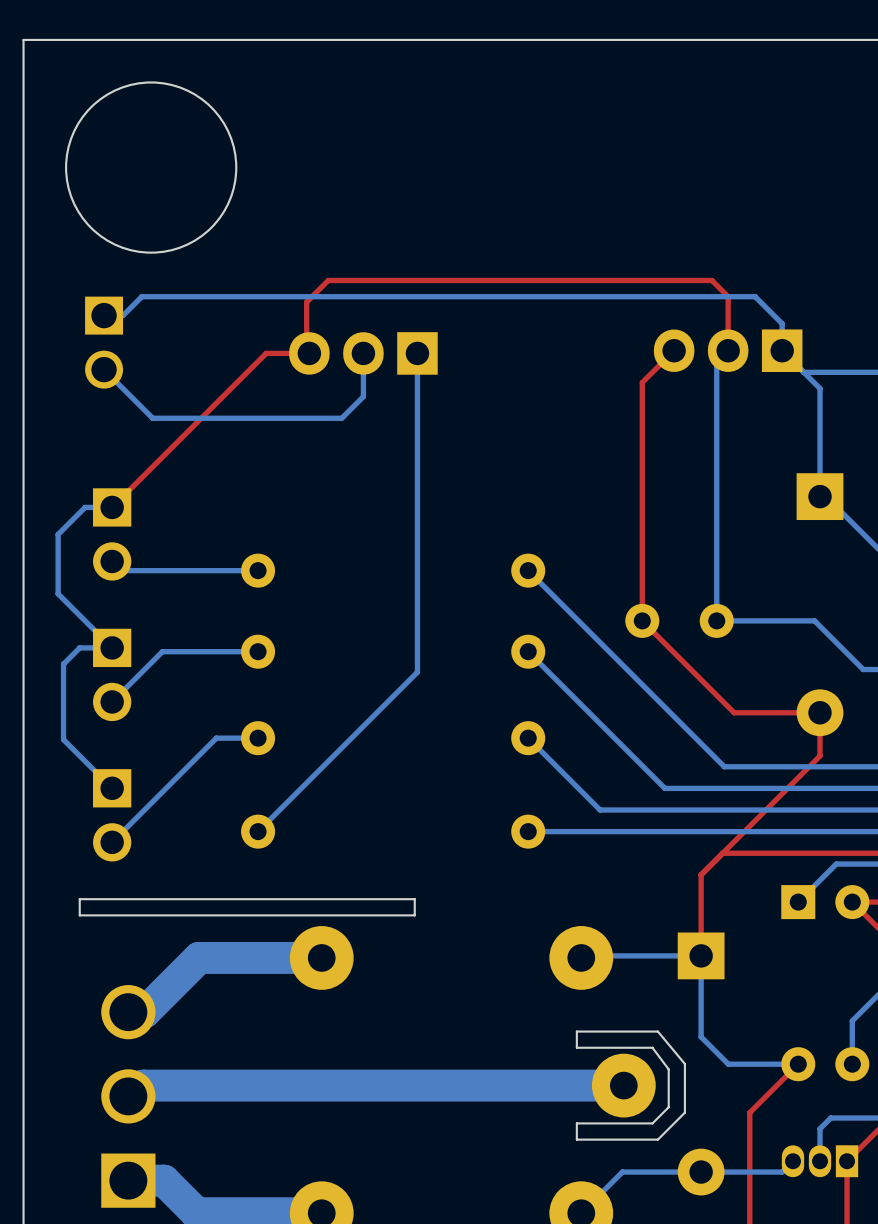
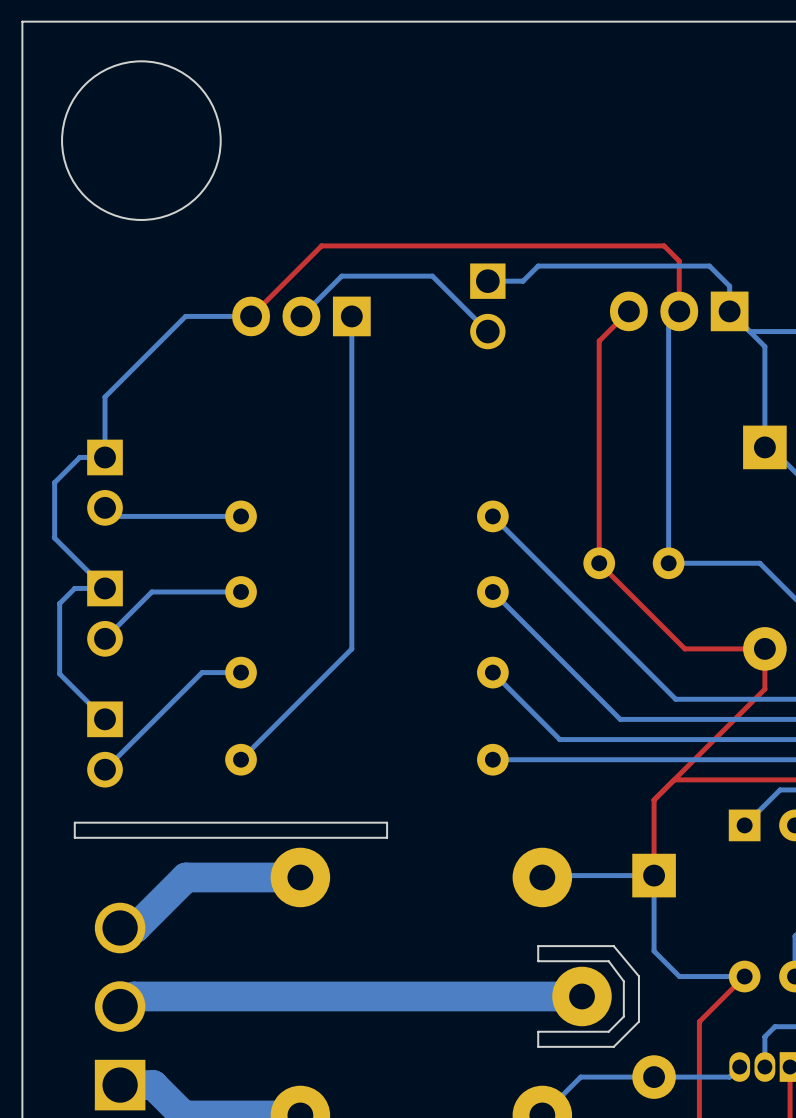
top track: (344, 280) (328, 280) (306, 302) (306, 356) -> (321, 245) (251, 316)
bottom track: (760, 302) (755, 296) (141, 296) (122, 315) (104, 315) -> (709, 266) (538, 266) (523, 281) (487, 281)
part position: (104, 342) -> (487, 306)
top track: (309, 353) (266, 353) (112, 507) -> none
bottom track: (363, 353) (363, 396) (341, 418) (152, 418) (104, 369) -> none
part position: (363, 353) -> (301, 316)
bottom track: (417, 353) (417, 672) (376, 712) -> (351, 316) (351, 648)
bottom track: none -> (251, 316) (185, 316) (105, 397) (105, 457)
bottom track: none -> (301, 316) (341, 276) (432, 276) (487, 331)

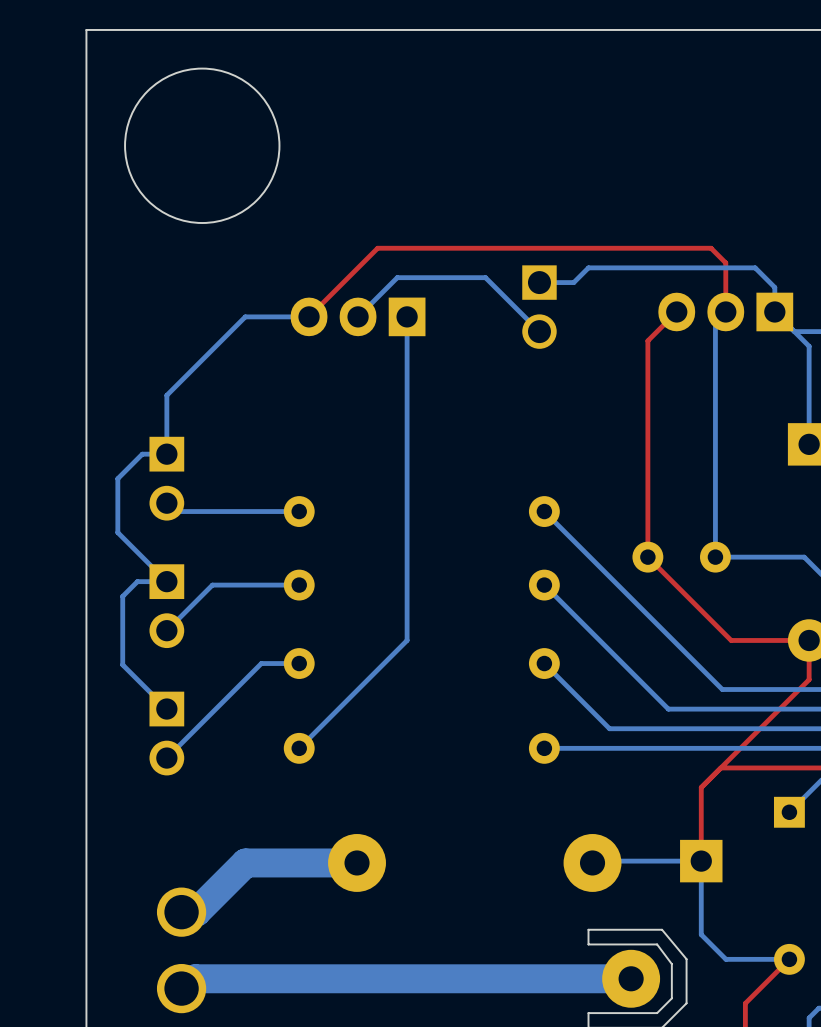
board edge: (387, 822) (74, 822) (74, 837) (387, 837) (387, 822) -> none

